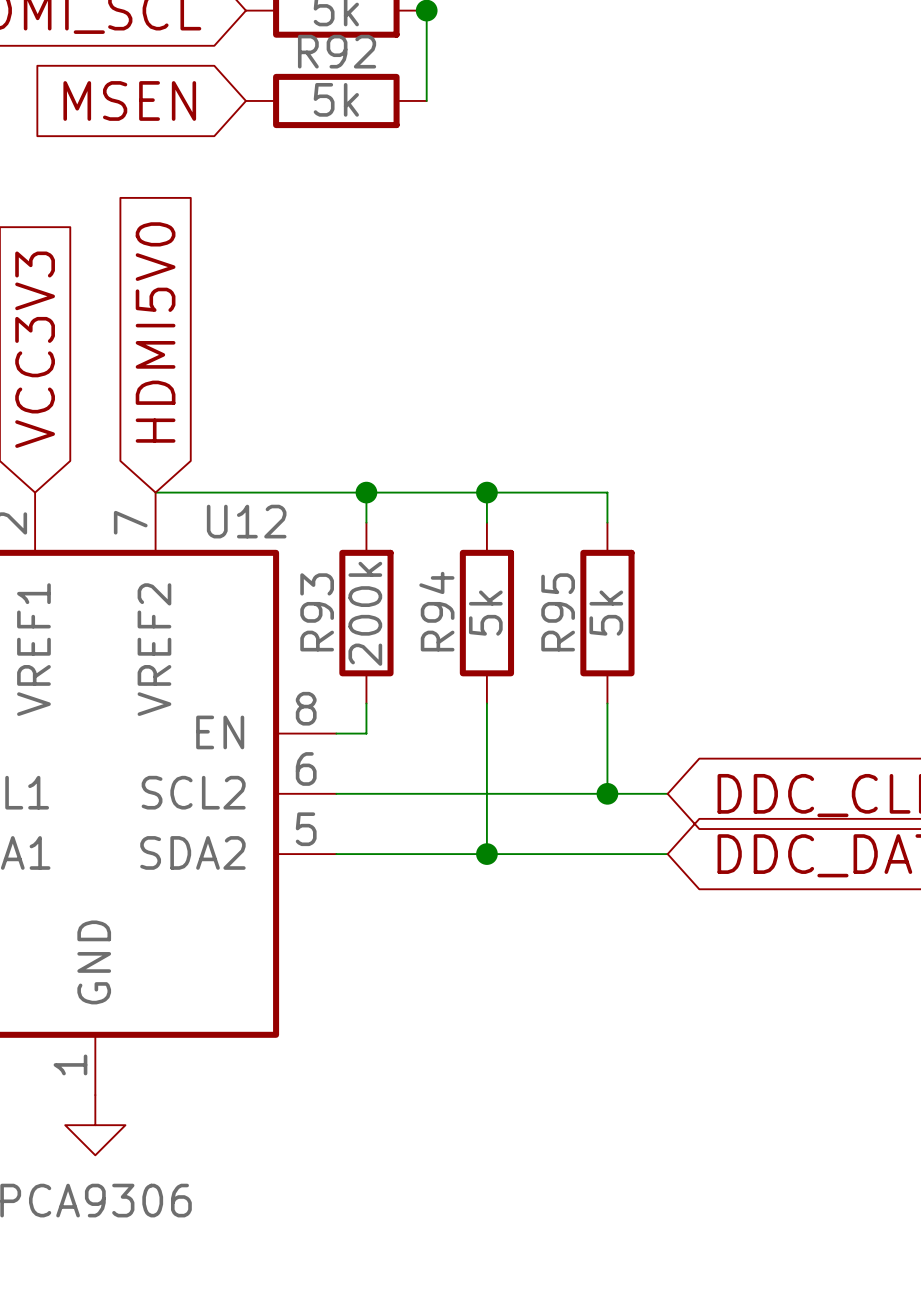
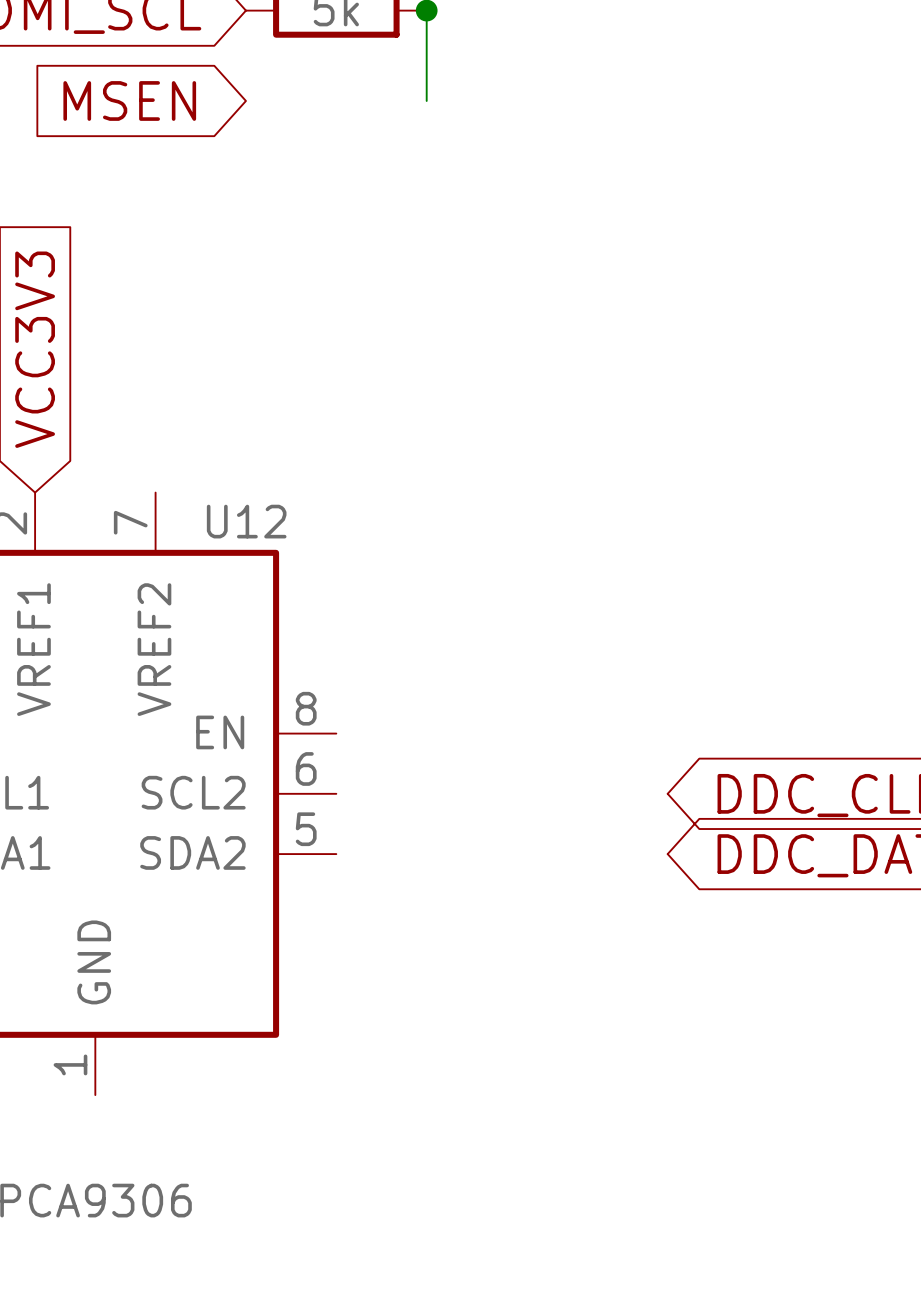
R92: 5k (336, 100) -> none
global label: HDMI5V0 (155, 332) -> none
wire: (155, 492) (607, 492) (607, 522) -> none
wire: (366, 492) (366, 522) -> none
junction: (366, 492) -> none
wire: (486, 492) (486, 522) -> none
junction: (486, 492) -> none
R93: 200k (366, 613) -> none
R94: 5k (486, 613) -> none
R95: 5k (607, 613) -> none
wire: (366, 703) (366, 733) (336, 733) -> none
wire: (486, 703) (486, 854) -> none
wire: (607, 703) (607, 793) -> none
wire: (336, 793) (667, 793) -> none
junction: (607, 793) -> none
wire: (336, 854) (667, 854) -> none
junction: (486, 854) -> none
power symbol: (95, 1125) -> none

